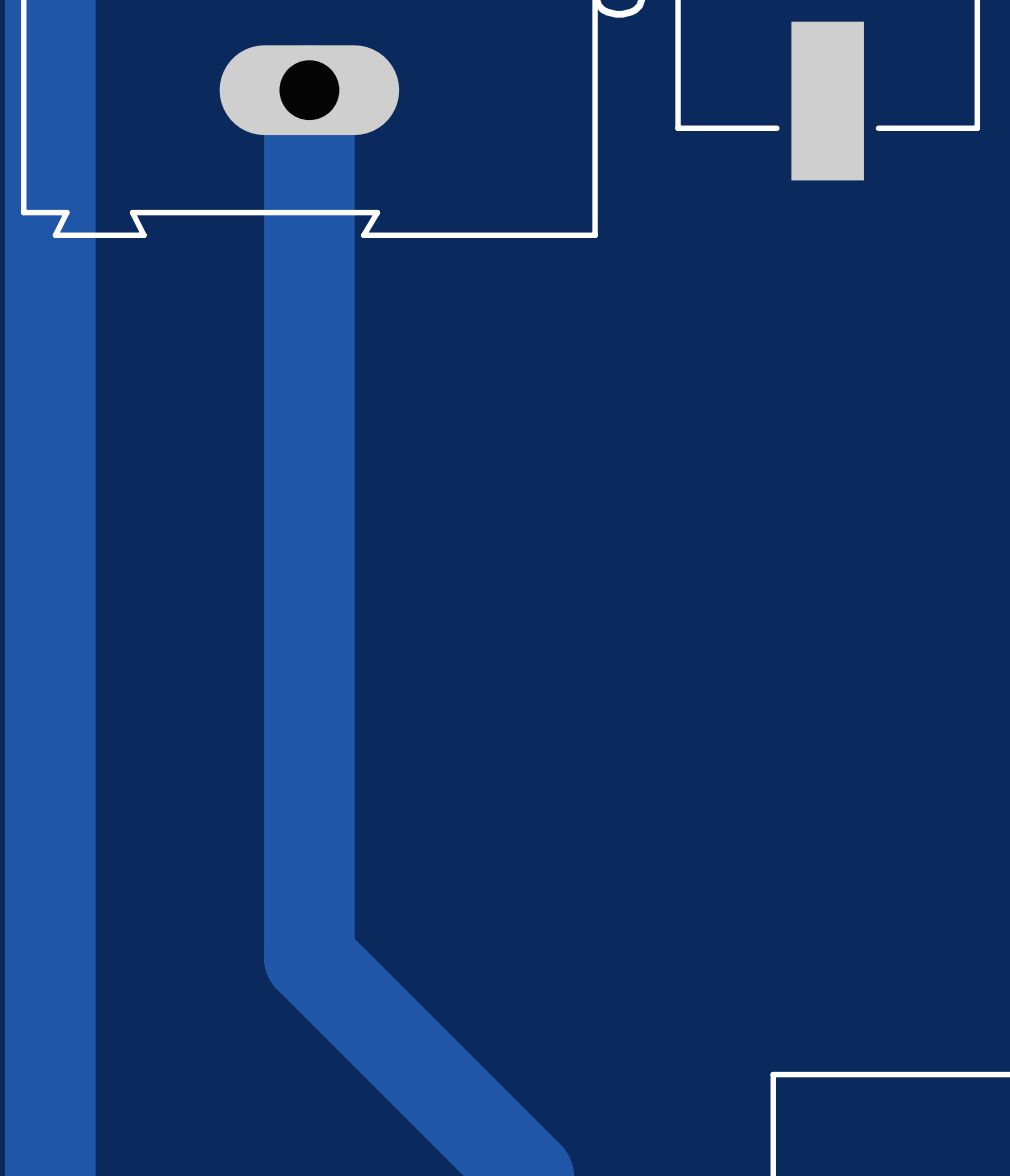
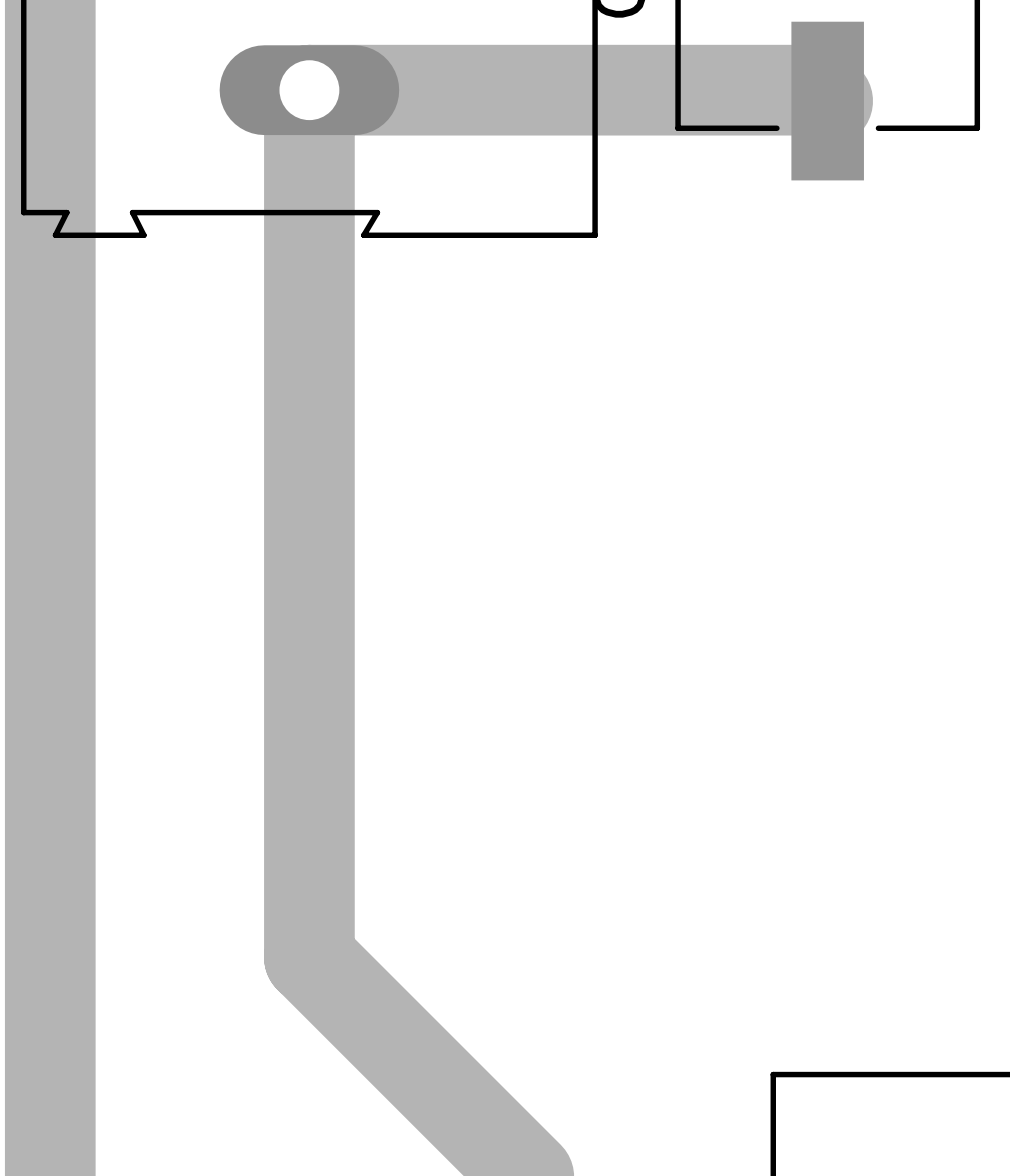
track: none -> (309, 90) (816, 90) (827, 101)

